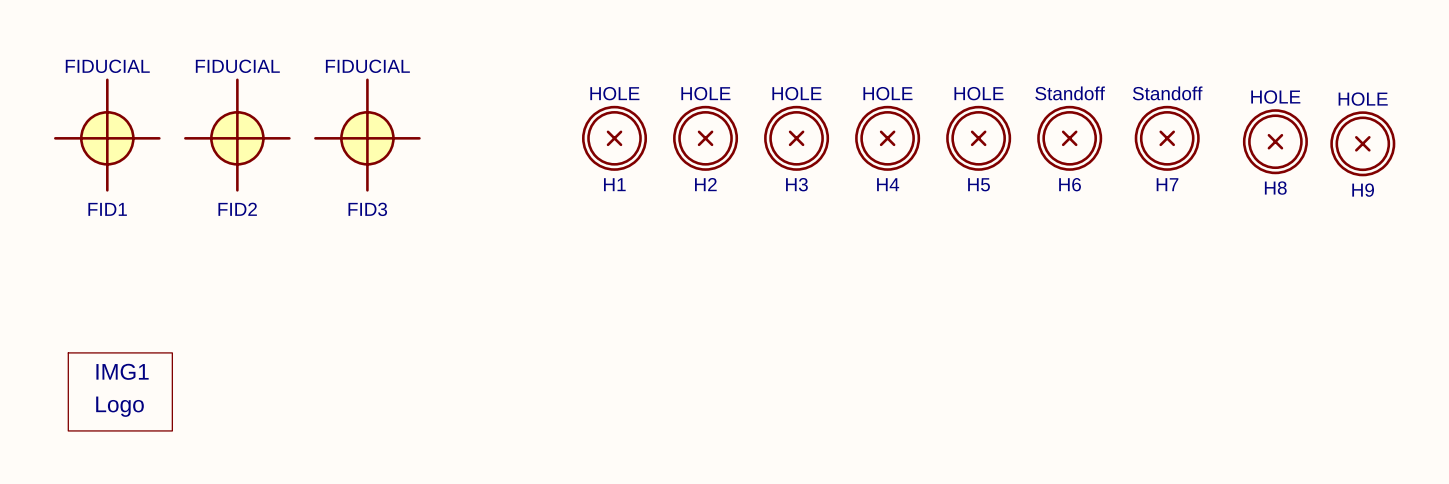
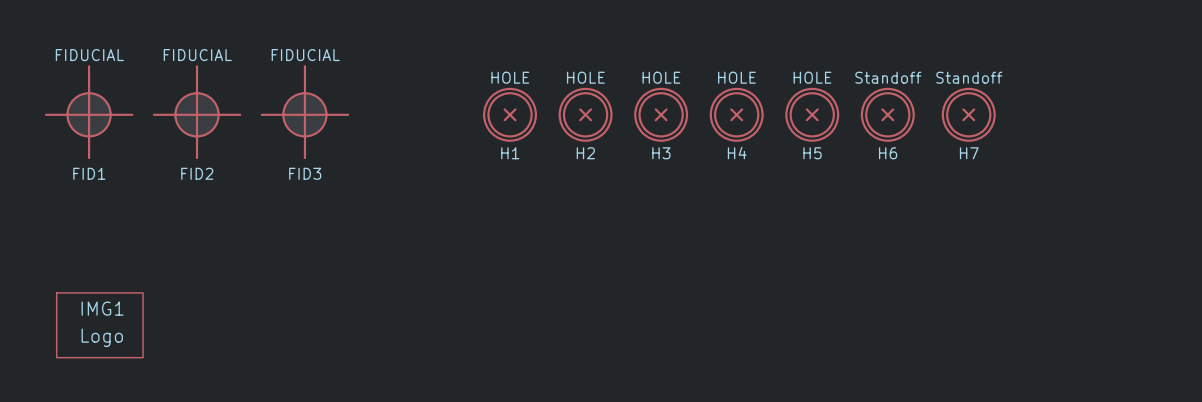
H8: HOLE (1275, 141) -> none
H9: HOLE (1362, 143) -> none

